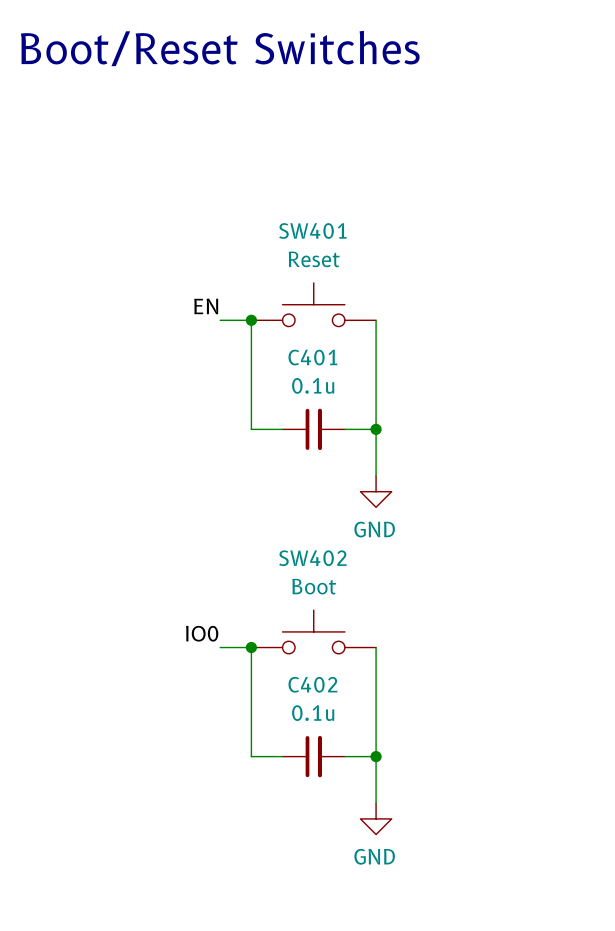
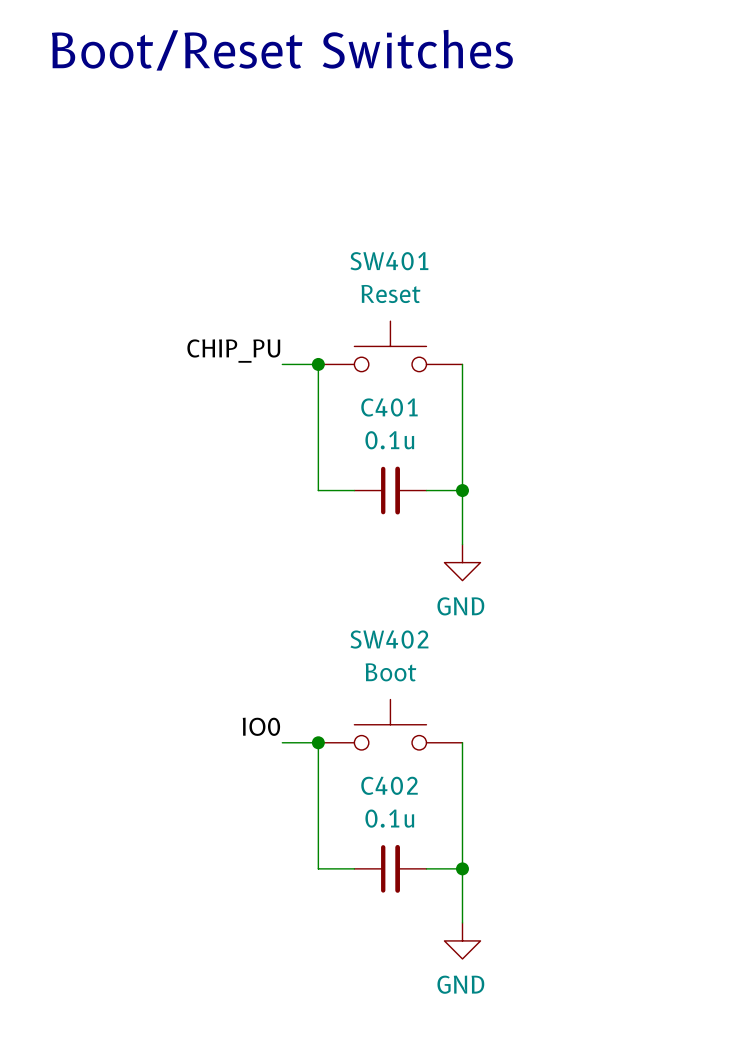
label: EN (206, 306) -> CHIP_PU (233, 351)

